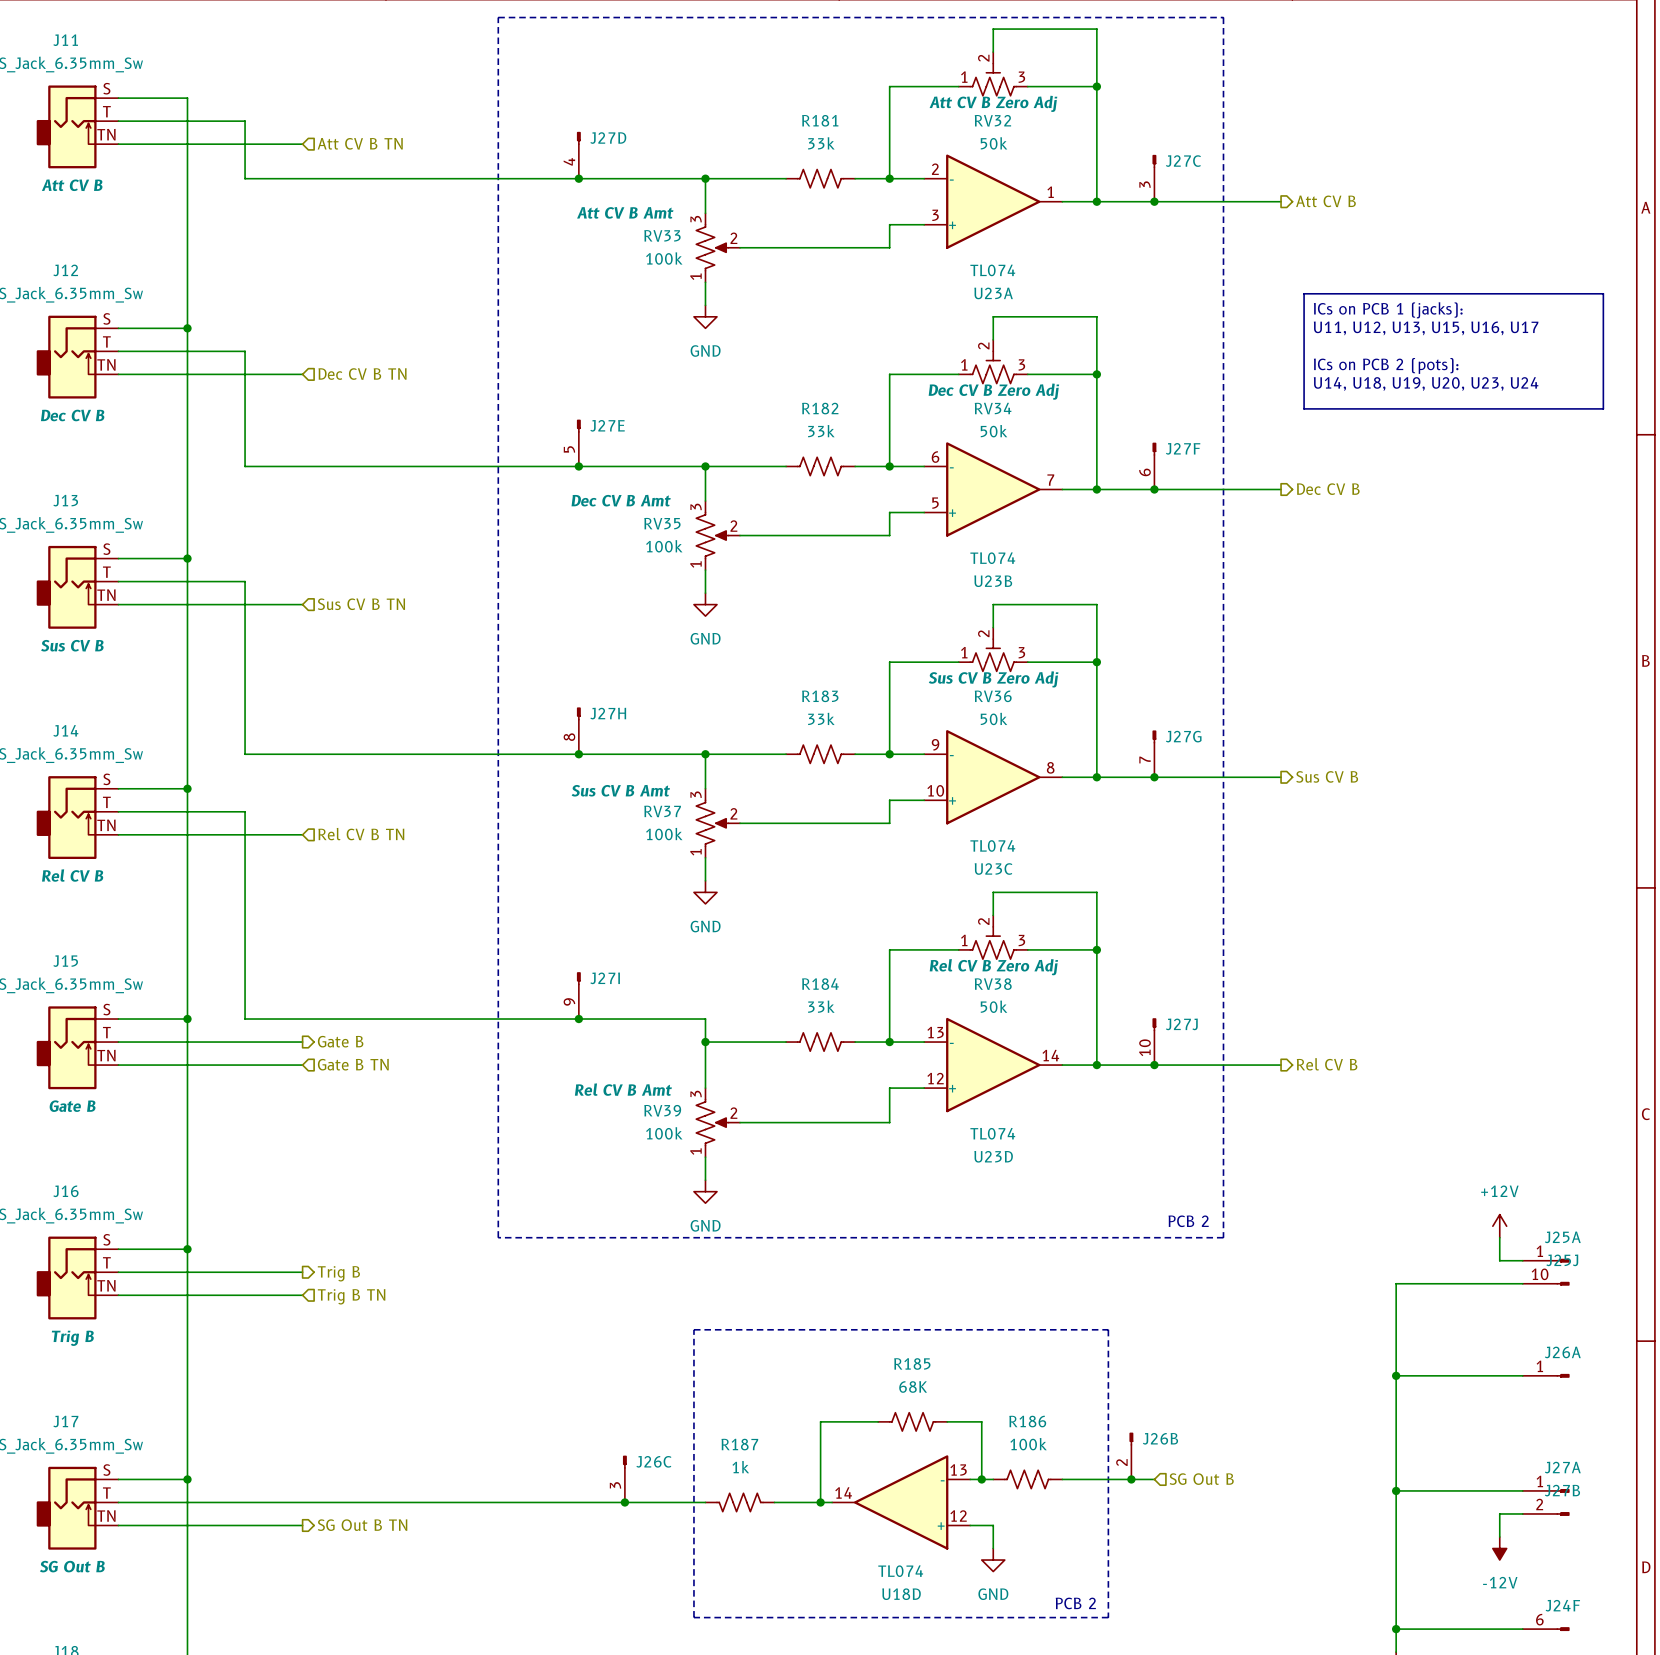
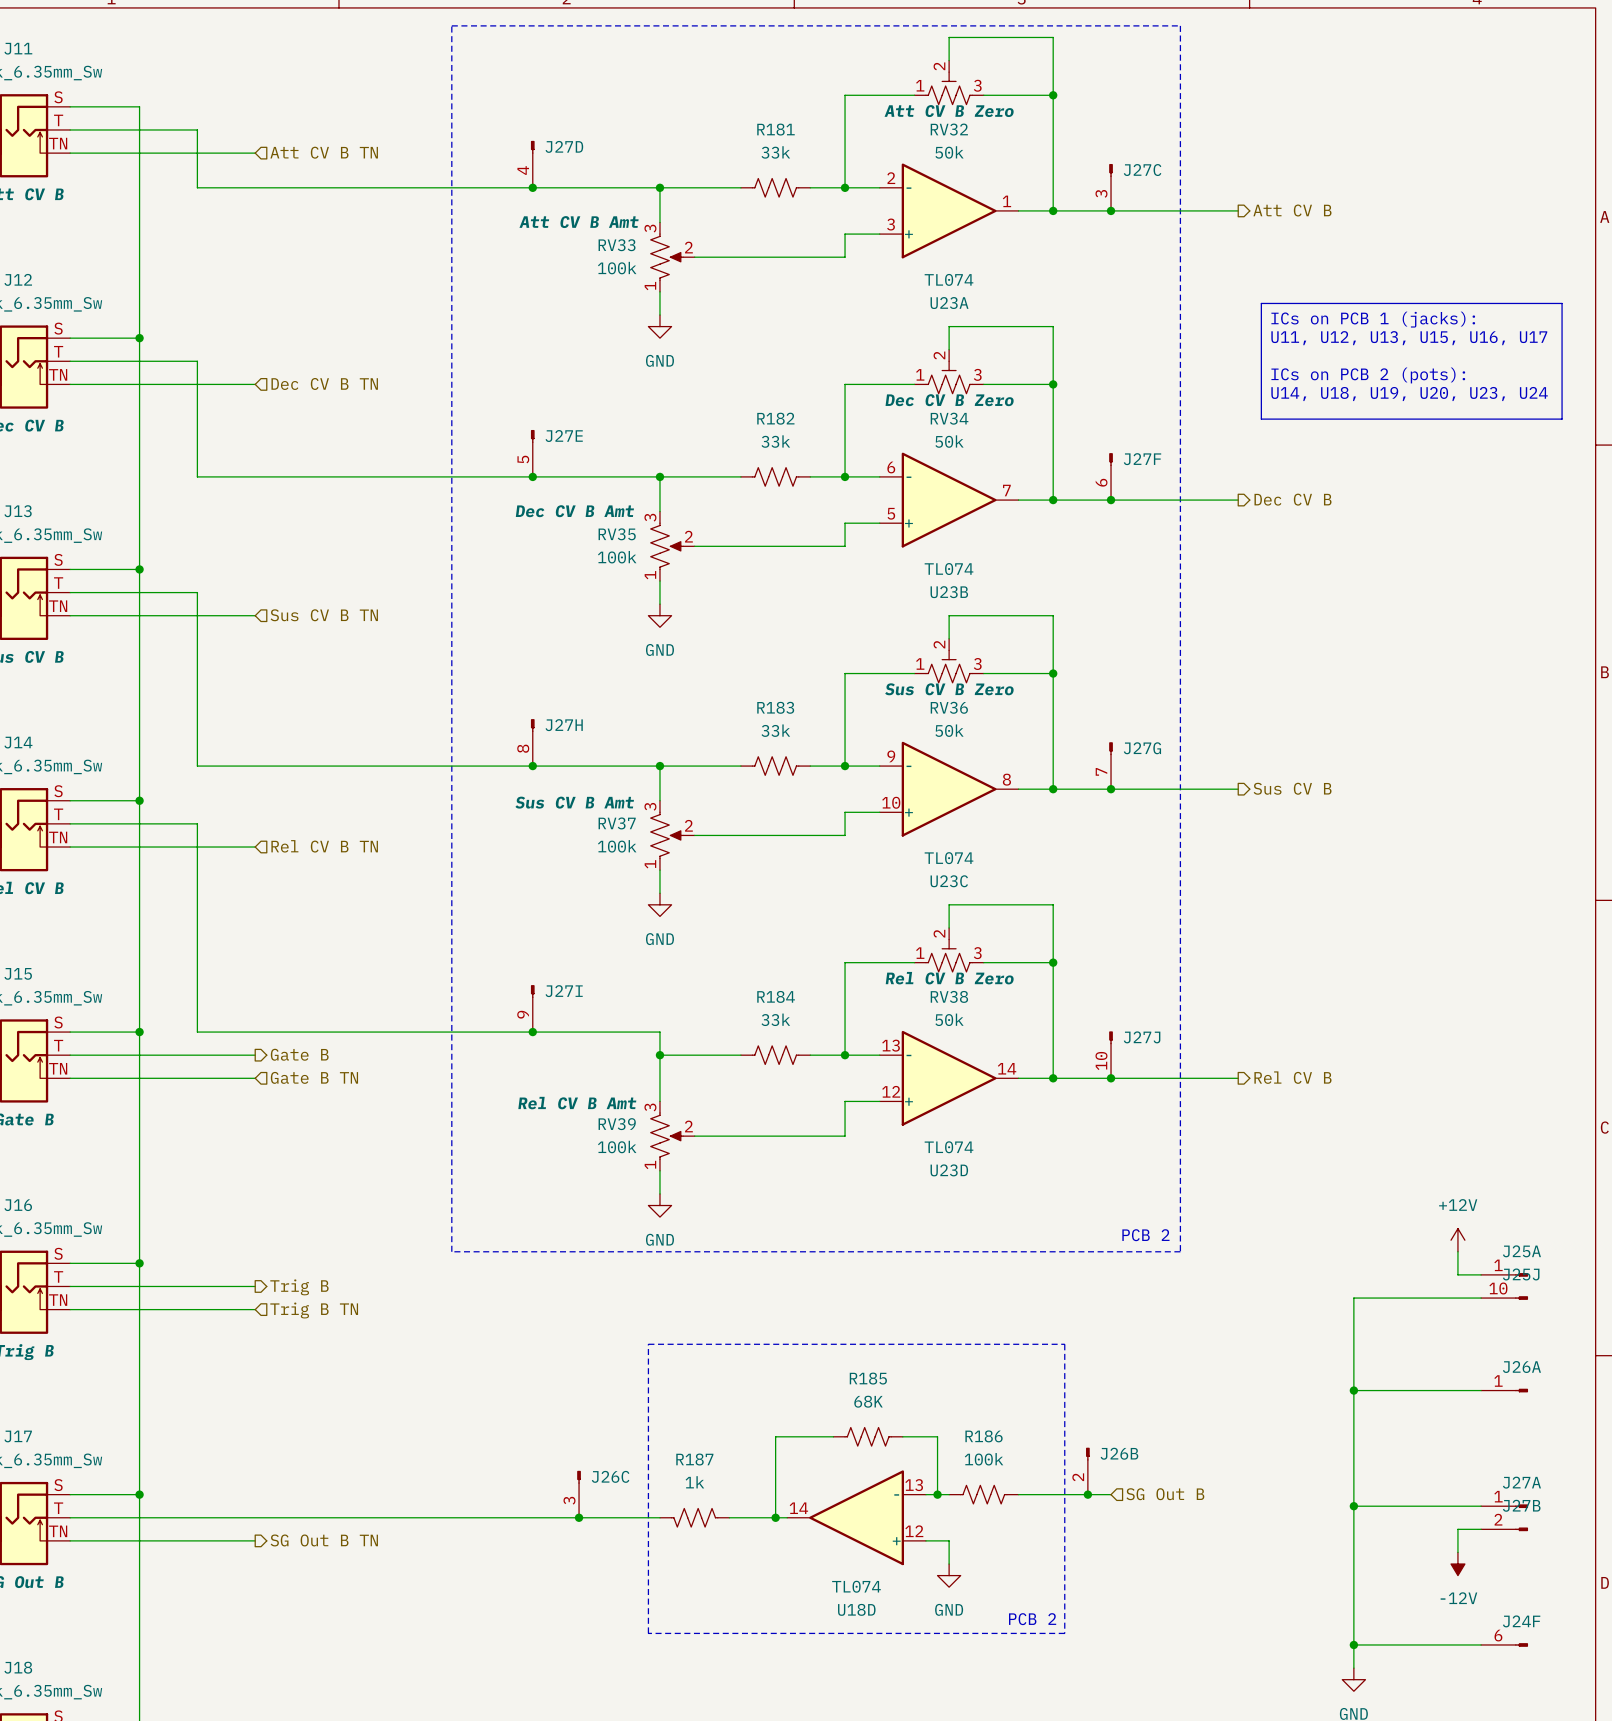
RV32 text: Att CV B Zero Adj (993, 103) -> Att CV B Zero (949, 111)
RV34 text: Dec CV B Zero Adj (993, 391) -> Dec CV B Zero (949, 400)
RV36 text: Sus CV B Zero Adj (993, 679) -> Sus CV B Zero (949, 689)
RV38 text: Rel CV B Zero Adj (993, 967) -> Rel CV B Zero (949, 978)

